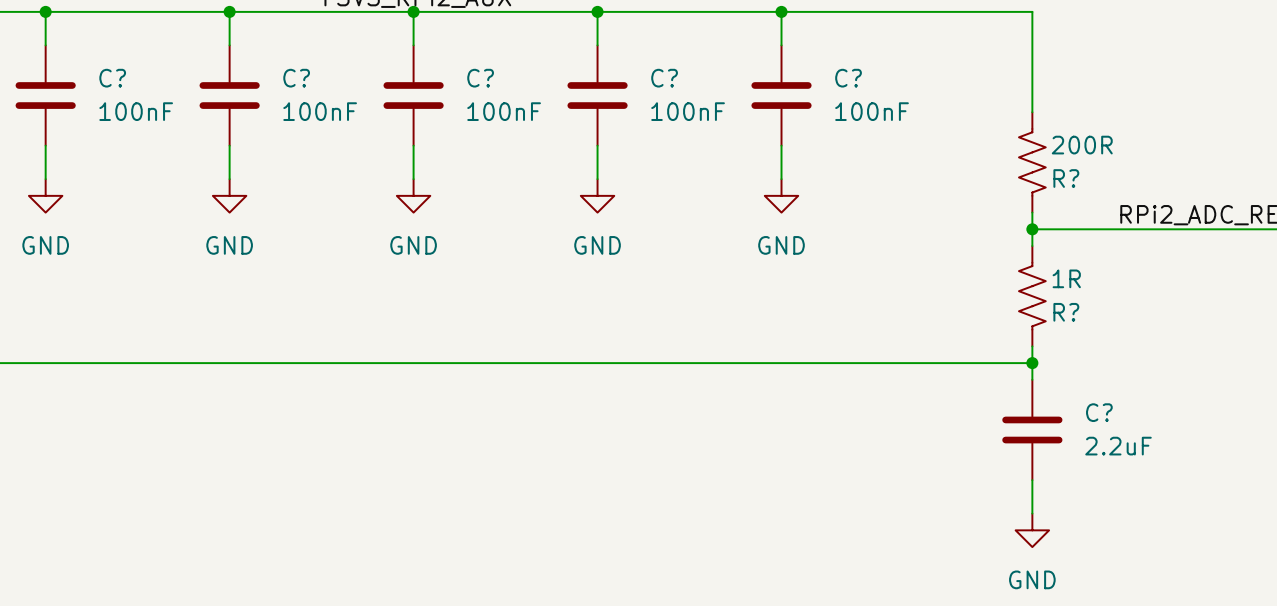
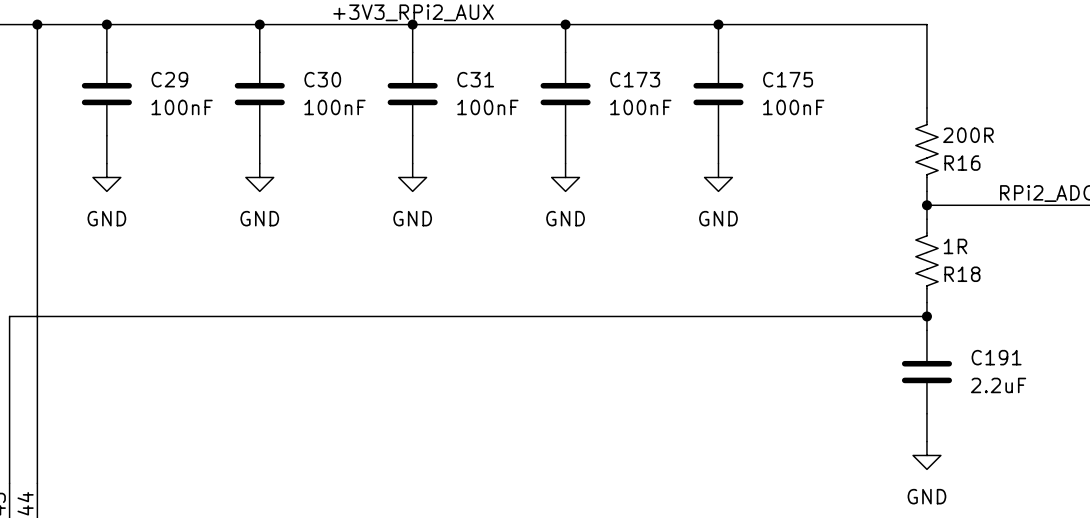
C? name: C? (112, 78) -> C29 (169, 79)
C? name: C? (296, 78) -> C30 (322, 79)
C? name: C? (480, 78) -> C31 (475, 79)
C? name: C? (664, 78) -> C173 (635, 79)
C? name: C? (848, 78) -> C175 (788, 79)
R? name: R? (1066, 178) -> R16 (962, 163)
R? name: R? (1066, 312) -> R18 (962, 274)
C? name: C? (1099, 412) -> C191 (996, 357)

